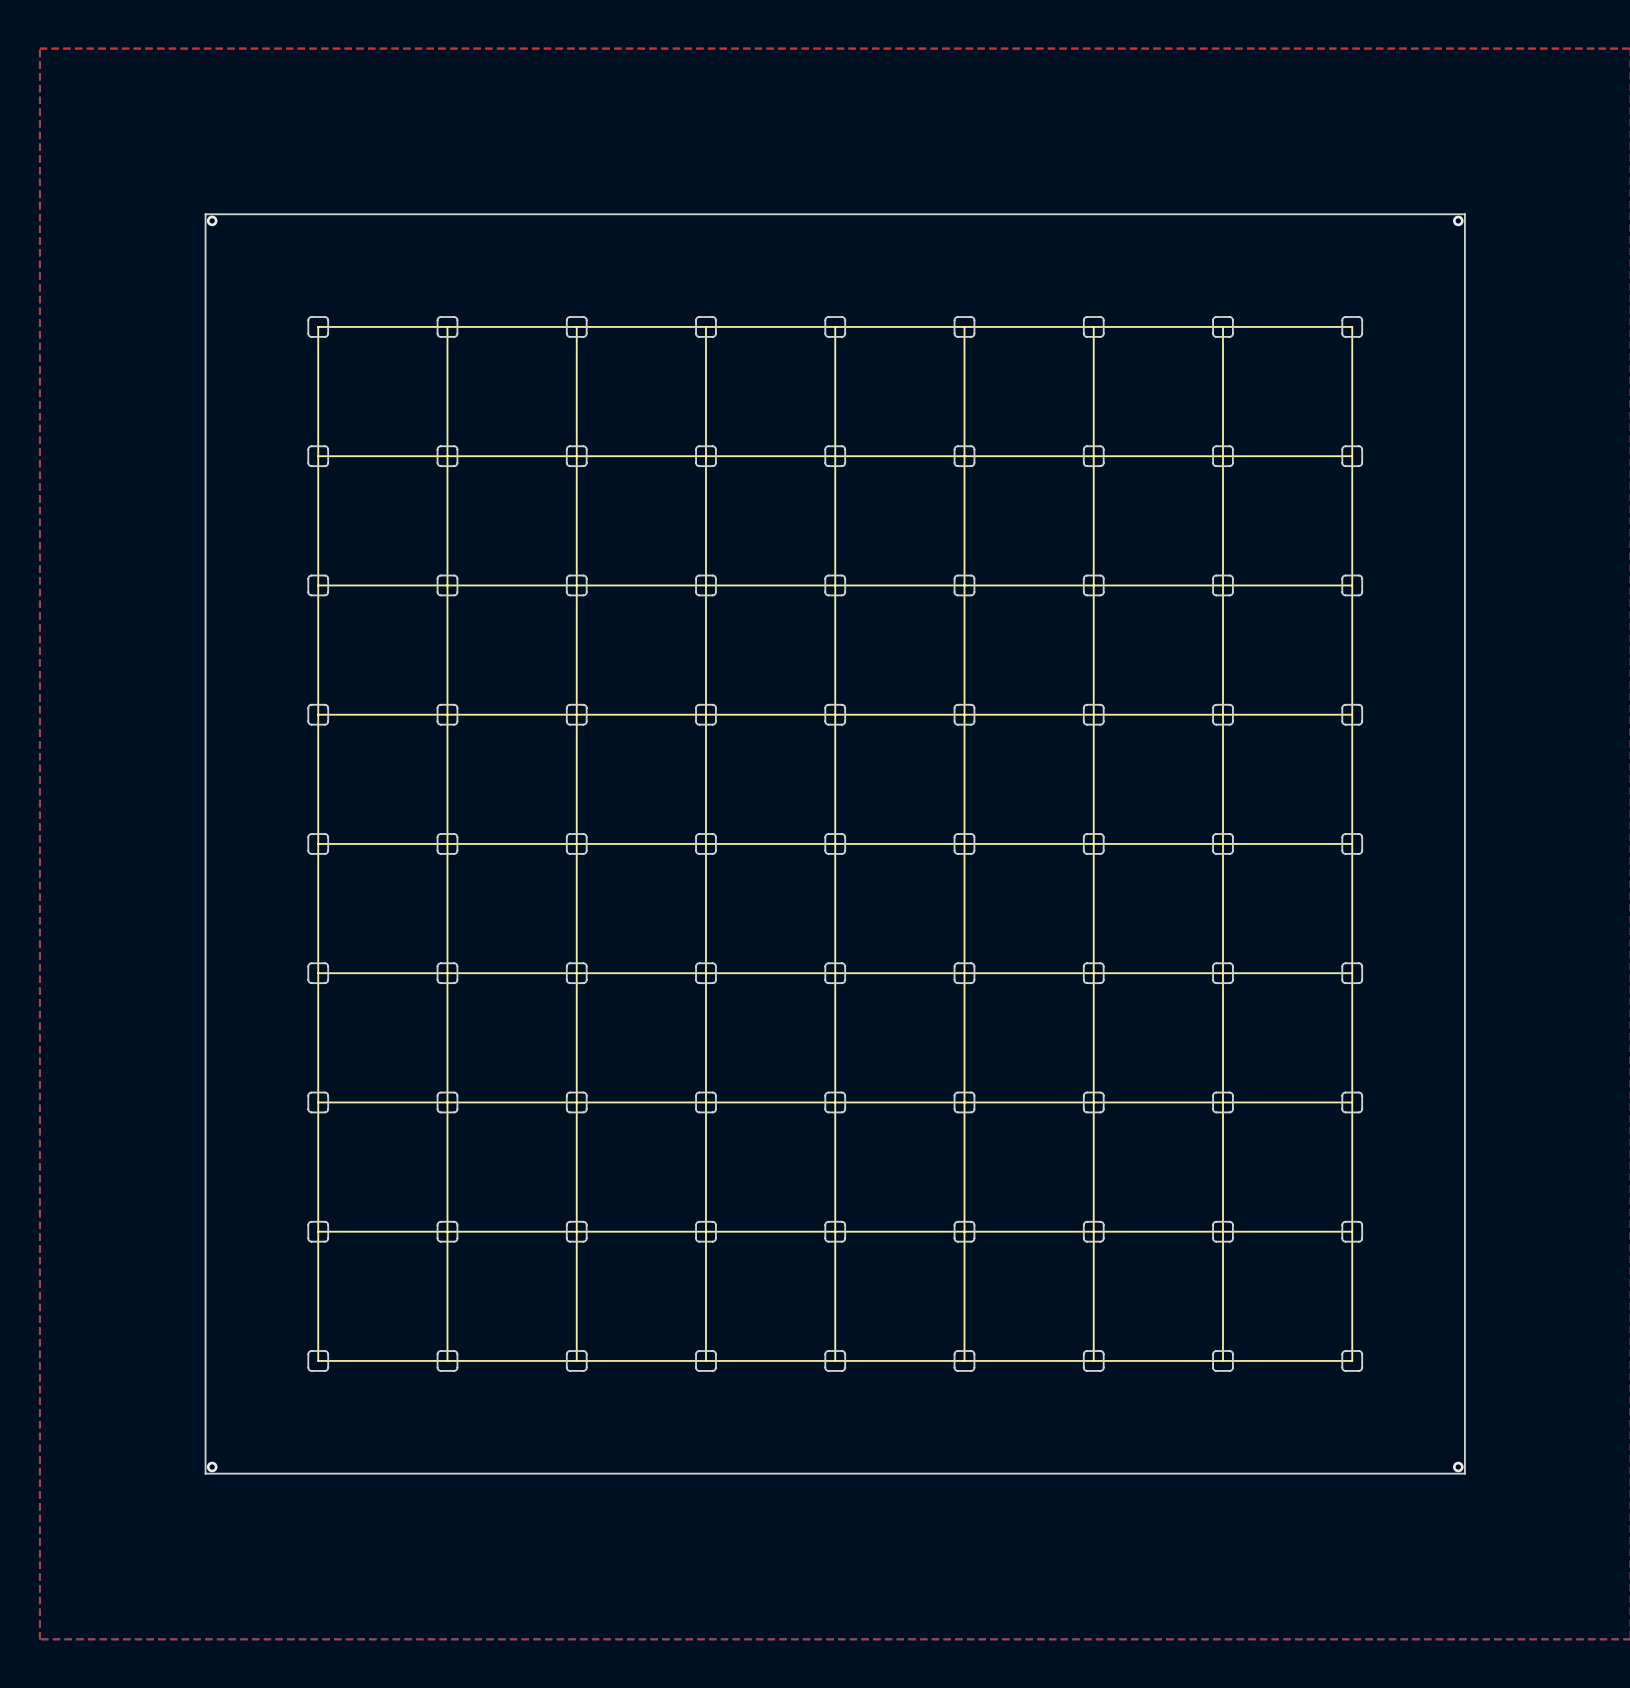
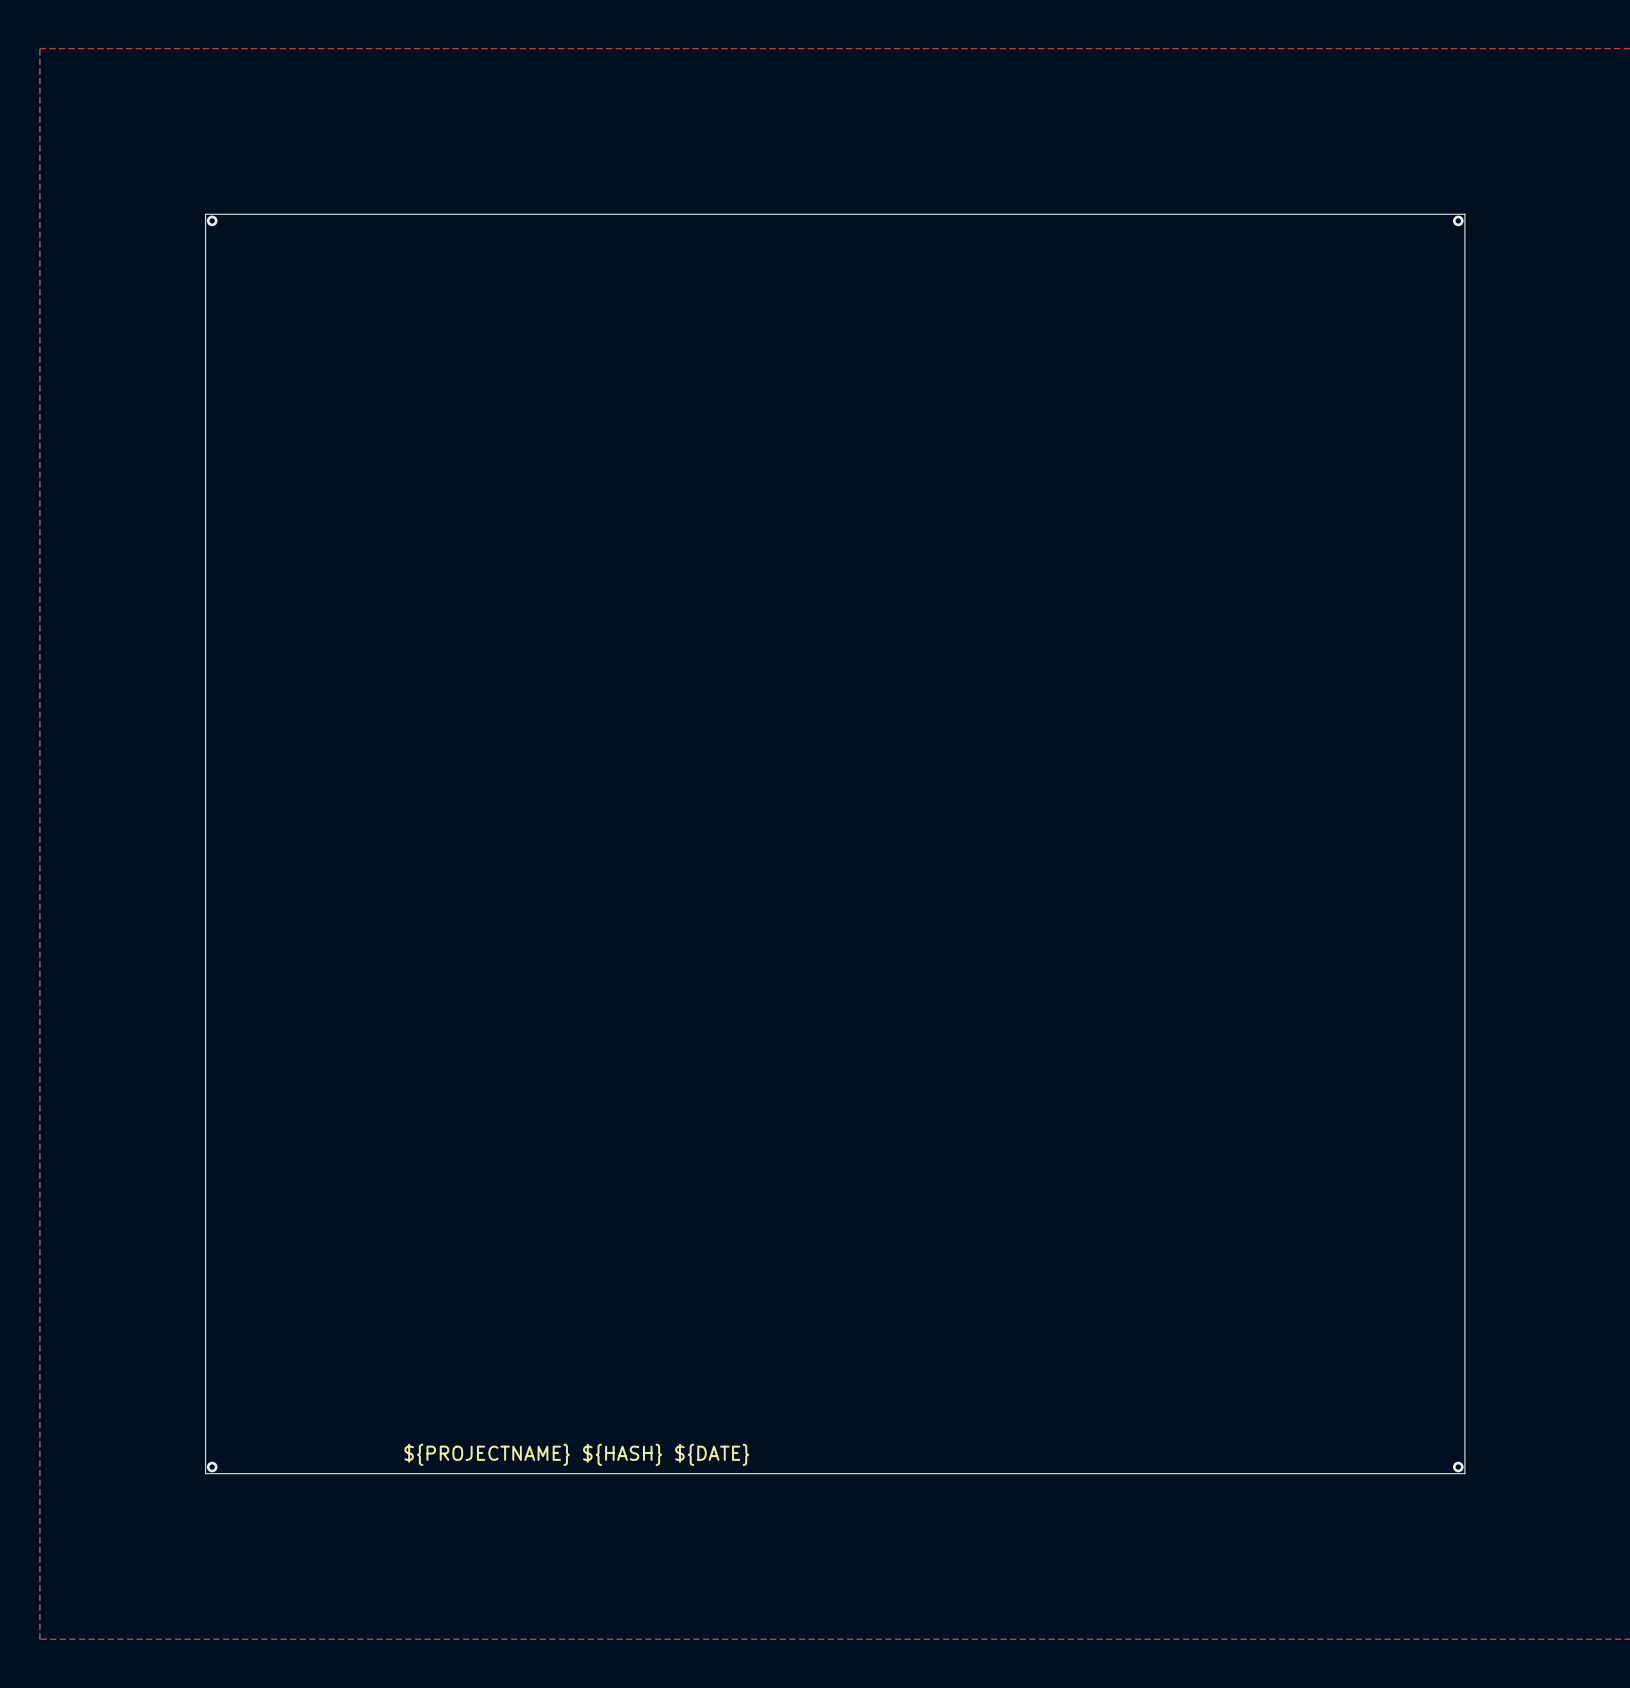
board edge: (311, 317) (327, 318) (326, 336) (309, 335) (308, 319) (311, 317) -> none
board edge: (440, 317) (456, 318) (456, 336) (438, 335) (437, 319) (440, 317) -> none
board edge: (570, 317) (585, 318) (585, 336) (567, 335) (566, 319) (570, 317) -> none
board edge: (699, 317) (715, 318) (714, 336) (696, 335) (696, 319) (699, 317) -> none
board edge: (828, 317) (844, 318) (843, 336) (826, 335) (825, 319) (828, 317) -> none
board edge: (957, 317) (973, 318) (973, 336) (955, 335) (954, 319) (957, 317) -> none
board edge: (1087, 317) (1102, 318) (1102, 336) (1084, 335) (1083, 319) (1087, 317) -> none
board edge: (1216, 317) (1232, 318) (1231, 336) (1213, 335) (1213, 319) (1216, 317) -> none
board edge: (1345, 317) (1361, 318) (1360, 336) (1343, 335) (1342, 319) (1345, 317) -> none
line: (318, 326) (318, 1360) (1352, 1360) (1352, 326) (318, 326) -> none
line: (447, 326) (447, 1360) -> none
line: (576, 326) (576, 1360) -> none
line: (705, 326) (705, 1360) -> none
line: (835, 326) (835, 1360) -> none
line: (964, 326) (964, 1360) -> none
line: (1093, 326) (1093, 1360) -> none
line: (1222, 326) (1222, 1360) -> none
board edge: (311, 446) (327, 447) (326, 465) (309, 464) (308, 449) (311, 446) -> none
board edge: (440, 446) (456, 447) (456, 465) (438, 464) (437, 449) (440, 446) -> none
board edge: (570, 446) (585, 447) (585, 465) (567, 464) (566, 449) (570, 446) -> none
board edge: (699, 446) (715, 447) (714, 465) (696, 464) (696, 449) (699, 446) -> none
board edge: (828, 446) (844, 447) (843, 465) (826, 464) (825, 449) (828, 446) -> none
board edge: (957, 446) (973, 447) (973, 465) (955, 464) (954, 449) (957, 446) -> none
board edge: (1087, 446) (1102, 447) (1102, 465) (1084, 464) (1083, 449) (1087, 446) -> none
board edge: (1216, 446) (1232, 447) (1231, 465) (1213, 464) (1213, 449) (1216, 446) -> none
board edge: (1345, 446) (1361, 447) (1360, 465) (1343, 464) (1342, 449) (1345, 446) -> none
line: (318, 456) (1352, 456) -> none
board edge: (311, 575) (327, 576) (326, 594) (309, 594) (308, 578) (311, 575) -> none
board edge: (440, 575) (456, 576) (456, 594) (438, 594) (437, 578) (440, 575) -> none
board edge: (570, 575) (585, 576) (585, 594) (567, 594) (566, 578) (570, 575) -> none
board edge: (699, 575) (715, 576) (714, 594) (696, 594) (696, 578) (699, 575) -> none
board edge: (828, 575) (844, 576) (843, 594) (826, 594) (825, 578) (828, 575) -> none
board edge: (957, 575) (973, 576) (973, 594) (955, 594) (954, 578) (957, 575) -> none
board edge: (1087, 575) (1102, 576) (1102, 594) (1084, 594) (1083, 578) (1087, 575) -> none
board edge: (1216, 575) (1232, 576) (1231, 594) (1213, 594) (1213, 578) (1216, 575) -> none
board edge: (1345, 575) (1361, 576) (1360, 594) (1343, 594) (1342, 578) (1345, 575) -> none
line: (318, 585) (1352, 585) -> none
board edge: (311, 704) (327, 706) (326, 723) (309, 723) (308, 707) (311, 704) -> none
board edge: (440, 704) (456, 706) (456, 723) (438, 723) (437, 707) (440, 704) -> none
board edge: (570, 704) (585, 706) (585, 723) (567, 723) (566, 707) (570, 704) -> none
board edge: (699, 704) (715, 706) (714, 723) (696, 723) (696, 707) (699, 704) -> none
board edge: (828, 704) (844, 706) (843, 723) (826, 723) (825, 707) (828, 704) -> none
board edge: (957, 704) (973, 706) (973, 723) (955, 723) (954, 707) (957, 704) -> none
board edge: (1087, 704) (1102, 706) (1102, 723) (1084, 723) (1083, 707) (1087, 704) -> none
board edge: (1216, 704) (1232, 706) (1231, 723) (1213, 723) (1213, 707) (1216, 704) -> none
board edge: (1345, 704) (1361, 706) (1360, 723) (1343, 723) (1342, 707) (1345, 704) -> none
line: (318, 714) (1352, 714) -> none
board edge: (311, 834) (327, 835) (326, 853) (309, 852) (308, 836) (311, 834) -> none
board edge: (440, 834) (456, 835) (456, 853) (438, 852) (437, 836) (440, 834) -> none
board edge: (570, 834) (585, 835) (585, 853) (567, 852) (566, 836) (570, 834) -> none
board edge: (699, 834) (715, 835) (714, 853) (696, 852) (696, 836) (699, 834) -> none
board edge: (828, 834) (844, 835) (843, 853) (826, 852) (825, 836) (828, 834) -> none
board edge: (957, 834) (973, 835) (973, 853) (955, 852) (954, 836) (957, 834) -> none
board edge: (1087, 834) (1102, 835) (1102, 853) (1084, 852) (1083, 836) (1087, 834) -> none
board edge: (1216, 834) (1232, 835) (1231, 853) (1213, 852) (1213, 836) (1216, 834) -> none
board edge: (1345, 834) (1361, 835) (1360, 853) (1343, 852) (1342, 836) (1345, 834) -> none
line: (318, 843) (1352, 843) -> none
board edge: (311, 963) (327, 964) (326, 982) (309, 981) (308, 966) (311, 963) -> none
board edge: (440, 963) (456, 964) (456, 982) (438, 981) (437, 966) (440, 963) -> none
board edge: (570, 963) (585, 964) (585, 982) (567, 981) (566, 966) (570, 963) -> none
board edge: (699, 963) (715, 964) (714, 982) (696, 981) (696, 966) (699, 963) -> none
board edge: (828, 963) (844, 964) (843, 982) (826, 981) (825, 966) (828, 963) -> none
board edge: (957, 963) (973, 964) (973, 982) (955, 981) (954, 966) (957, 963) -> none
board edge: (1087, 963) (1102, 964) (1102, 982) (1084, 981) (1083, 966) (1087, 963) -> none
board edge: (1216, 963) (1232, 964) (1231, 982) (1213, 981) (1213, 966) (1216, 963) -> none
board edge: (1345, 963) (1361, 964) (1360, 982) (1343, 981) (1342, 966) (1345, 963) -> none
line: (318, 973) (1352, 973) -> none
board edge: (311, 1092) (327, 1093) (326, 1111) (309, 1111) (308, 1095) (311, 1092) -> none
board edge: (440, 1092) (456, 1093) (456, 1111) (438, 1111) (437, 1095) (440, 1092) -> none
board edge: (570, 1092) (585, 1093) (585, 1111) (567, 1111) (566, 1095) (570, 1092) -> none
board edge: (699, 1092) (715, 1093) (714, 1111) (696, 1111) (696, 1095) (699, 1092) -> none
board edge: (828, 1092) (844, 1093) (843, 1111) (826, 1111) (825, 1095) (828, 1092) -> none
board edge: (957, 1092) (973, 1093) (973, 1111) (955, 1111) (954, 1095) (957, 1092) -> none
board edge: (1087, 1092) (1102, 1093) (1102, 1111) (1084, 1111) (1083, 1095) (1087, 1092) -> none
board edge: (1216, 1092) (1232, 1093) (1231, 1111) (1213, 1111) (1213, 1095) (1216, 1092) -> none
board edge: (1345, 1092) (1361, 1093) (1360, 1111) (1343, 1111) (1342, 1095) (1345, 1092) -> none
line: (318, 1102) (1352, 1102) -> none
board edge: (311, 1221) (327, 1223) (326, 1240) (309, 1240) (308, 1224) (311, 1221) -> none
board edge: (440, 1221) (456, 1223) (456, 1240) (438, 1240) (437, 1224) (440, 1221) -> none
board edge: (570, 1221) (585, 1223) (585, 1240) (567, 1240) (566, 1224) (570, 1221) -> none
board edge: (699, 1221) (715, 1223) (714, 1240) (696, 1240) (696, 1224) (699, 1221) -> none
board edge: (828, 1221) (844, 1223) (843, 1240) (826, 1240) (825, 1224) (828, 1221) -> none
board edge: (957, 1221) (973, 1223) (973, 1240) (955, 1240) (954, 1224) (957, 1221) -> none
board edge: (1087, 1221) (1102, 1223) (1102, 1240) (1084, 1240) (1083, 1224) (1087, 1221) -> none
board edge: (1216, 1221) (1232, 1223) (1231, 1240) (1213, 1240) (1213, 1224) (1216, 1221) -> none
board edge: (1345, 1221) (1361, 1223) (1360, 1240) (1343, 1240) (1342, 1224) (1345, 1221) -> none
line: (318, 1231) (1352, 1231) -> none
board edge: (311, 1351) (327, 1352) (326, 1370) (309, 1369) (308, 1353) (311, 1351) -> none
board edge: (440, 1351) (456, 1352) (456, 1370) (438, 1369) (437, 1353) (440, 1351) -> none
board edge: (570, 1351) (585, 1352) (585, 1370) (567, 1369) (566, 1353) (570, 1351) -> none
board edge: (699, 1351) (715, 1352) (714, 1370) (696, 1369) (696, 1353) (699, 1351) -> none
board edge: (828, 1351) (844, 1352) (843, 1370) (826, 1369) (825, 1353) (828, 1351) -> none
board edge: (957, 1351) (973, 1352) (973, 1370) (955, 1369) (954, 1353) (957, 1351) -> none
board edge: (1087, 1351) (1102, 1352) (1102, 1370) (1084, 1369) (1083, 1353) (1087, 1351) -> none
board edge: (1216, 1351) (1232, 1352) (1231, 1370) (1213, 1369) (1213, 1353) (1216, 1351) -> none
board edge: (1345, 1351) (1361, 1352) (1360, 1370) (1343, 1369) (1342, 1353) (1345, 1351) -> none
text: none -> ${PROJECTNAME} ${HASH} ${DATE} (576, 1454)

